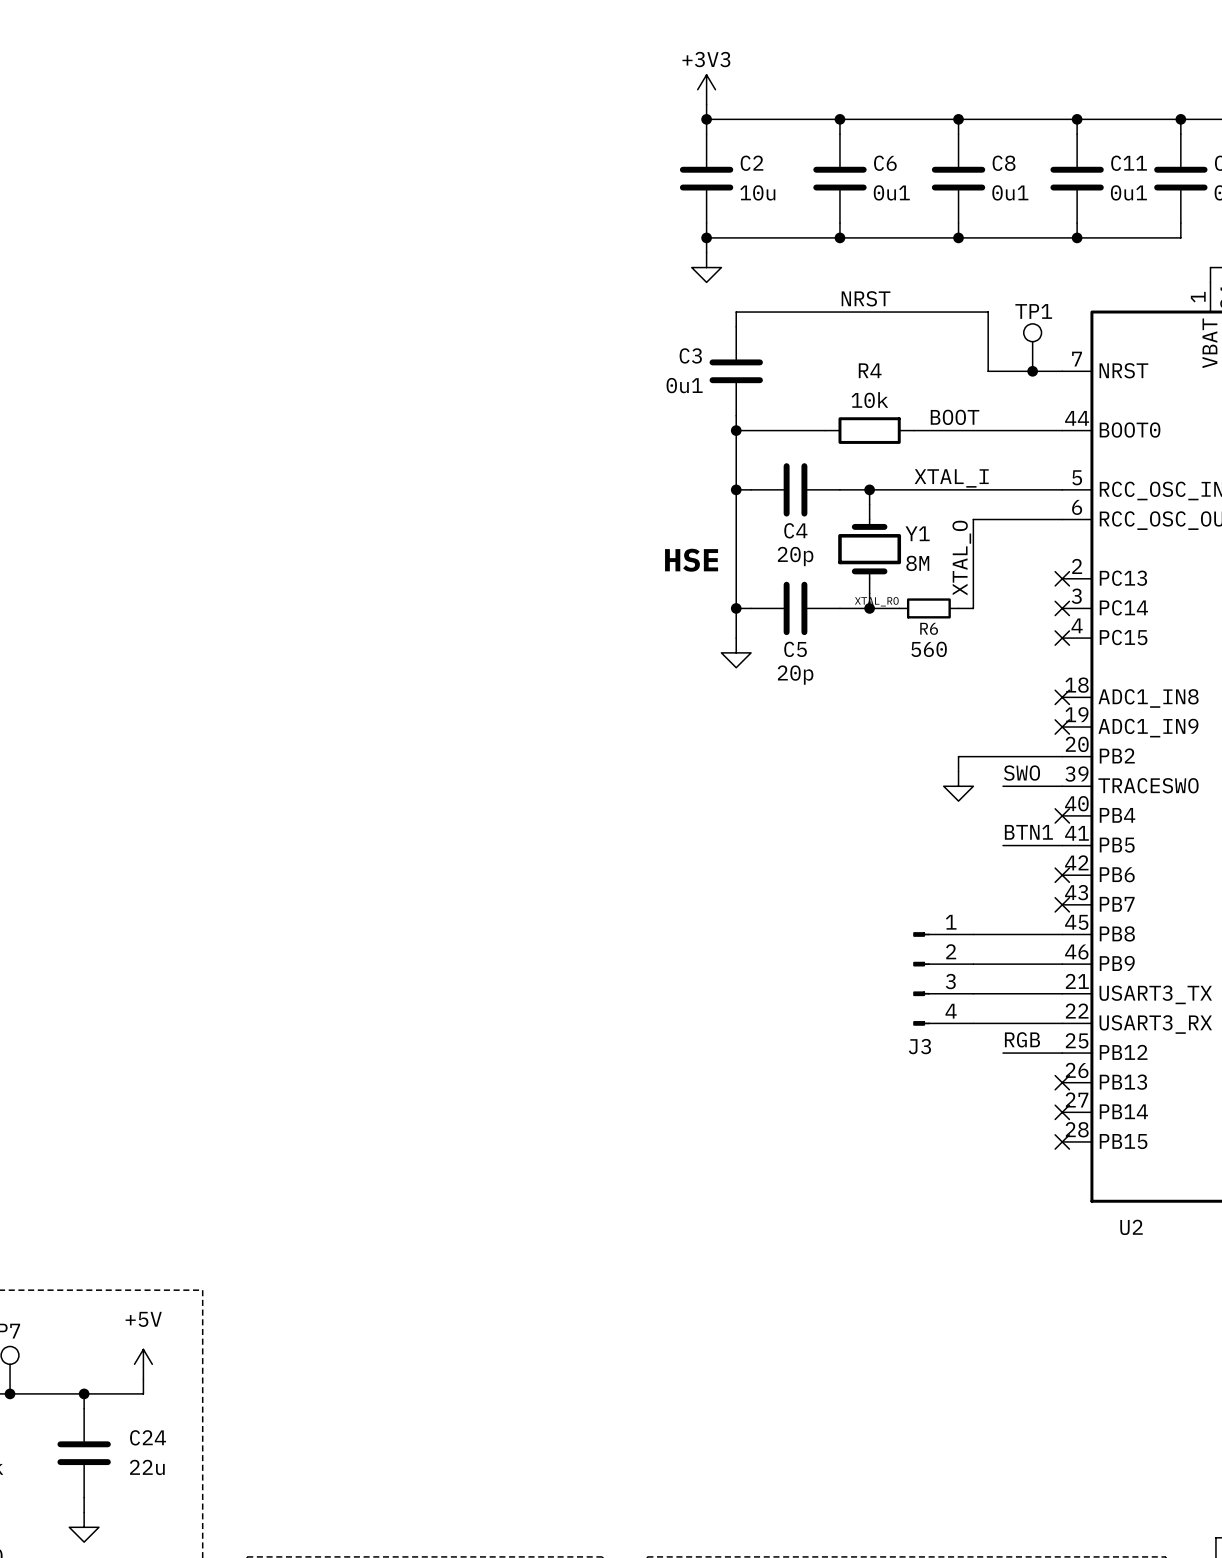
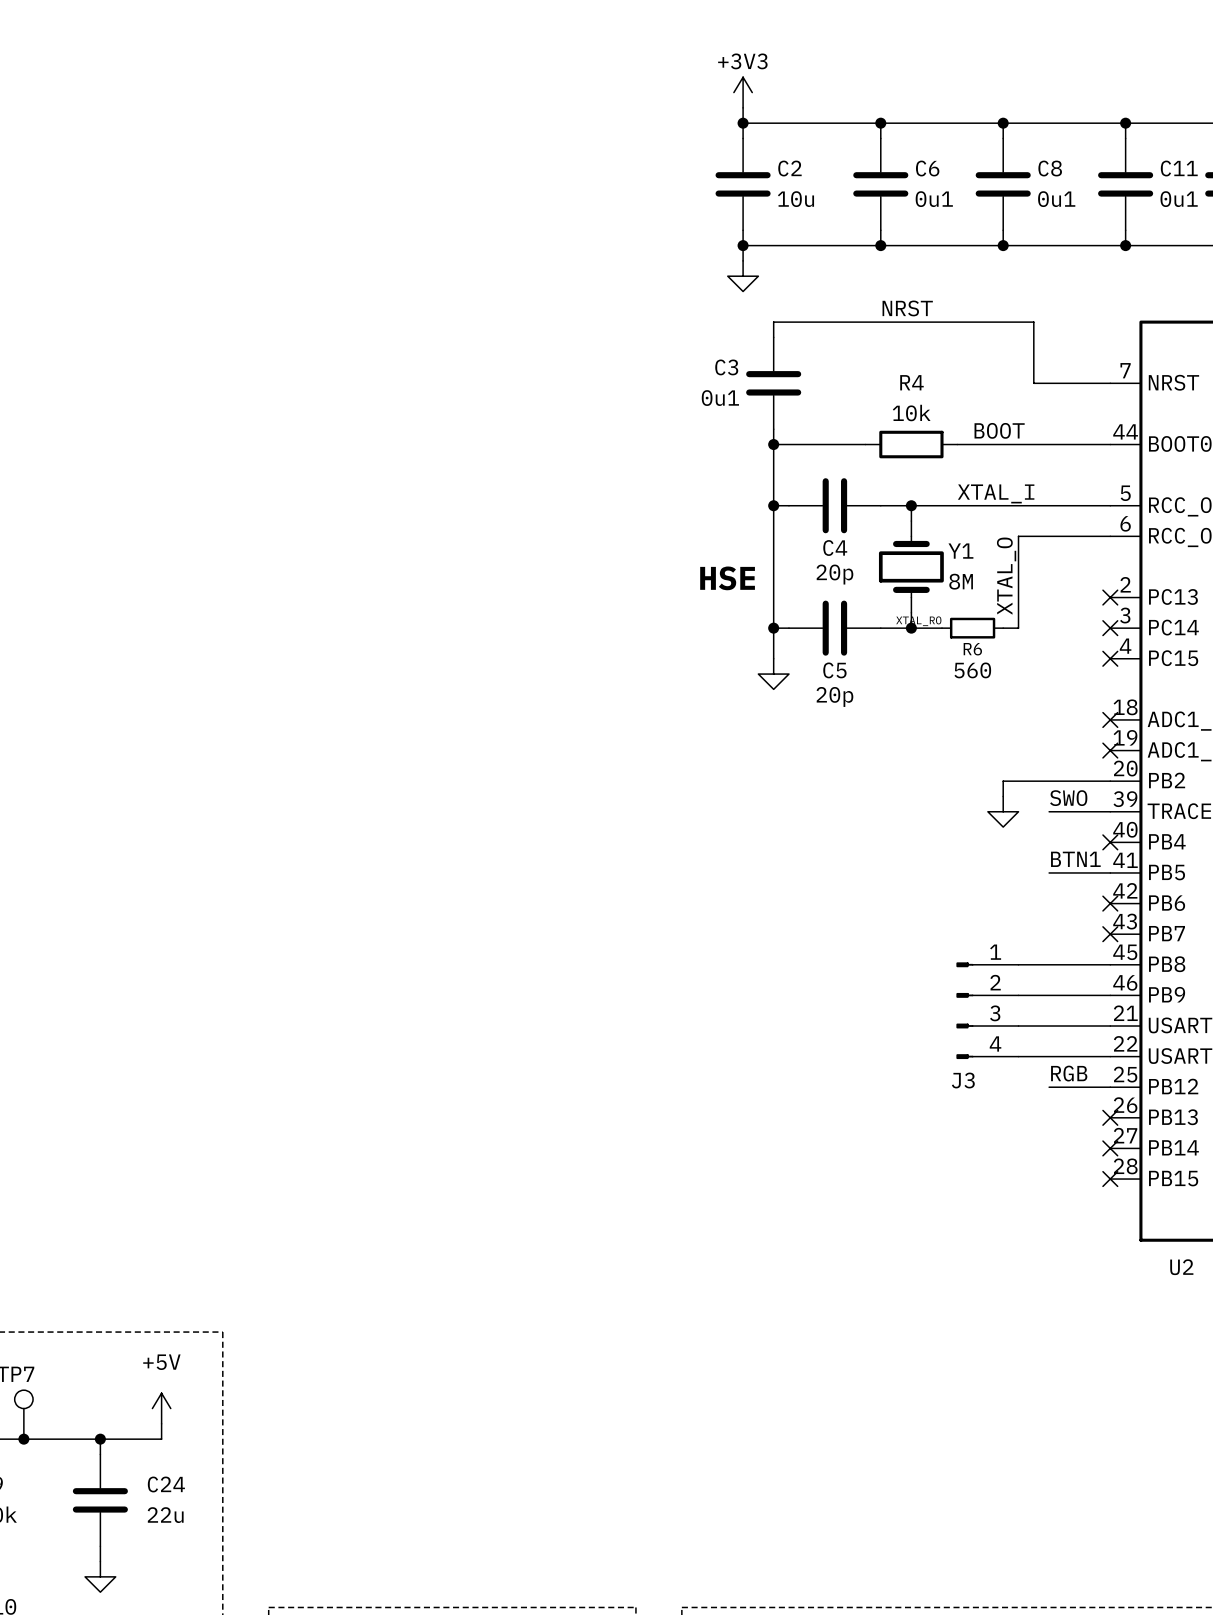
TP1: (1032, 347) -> none
junction: (1032, 371) -> none

